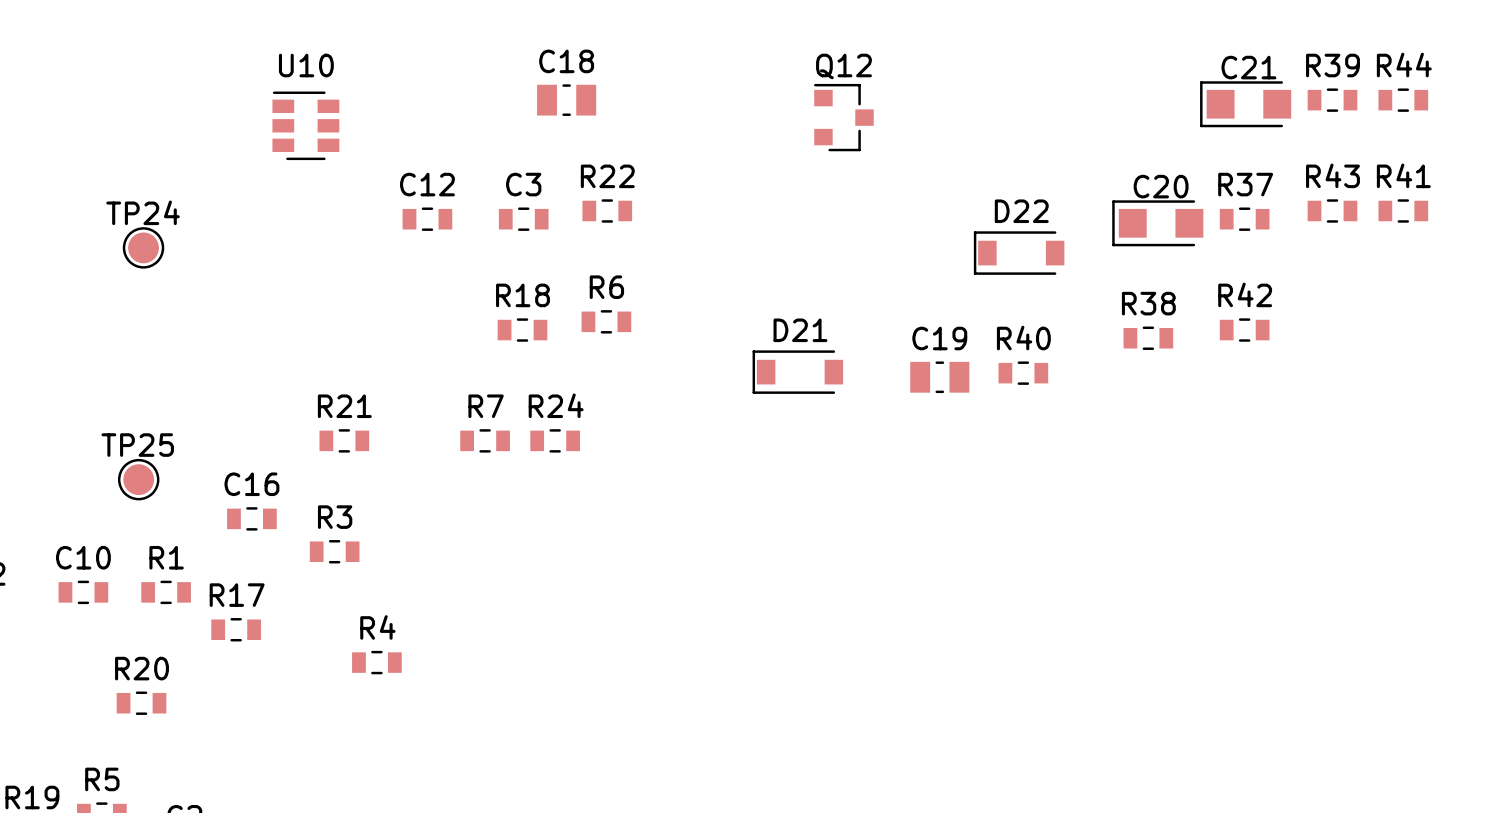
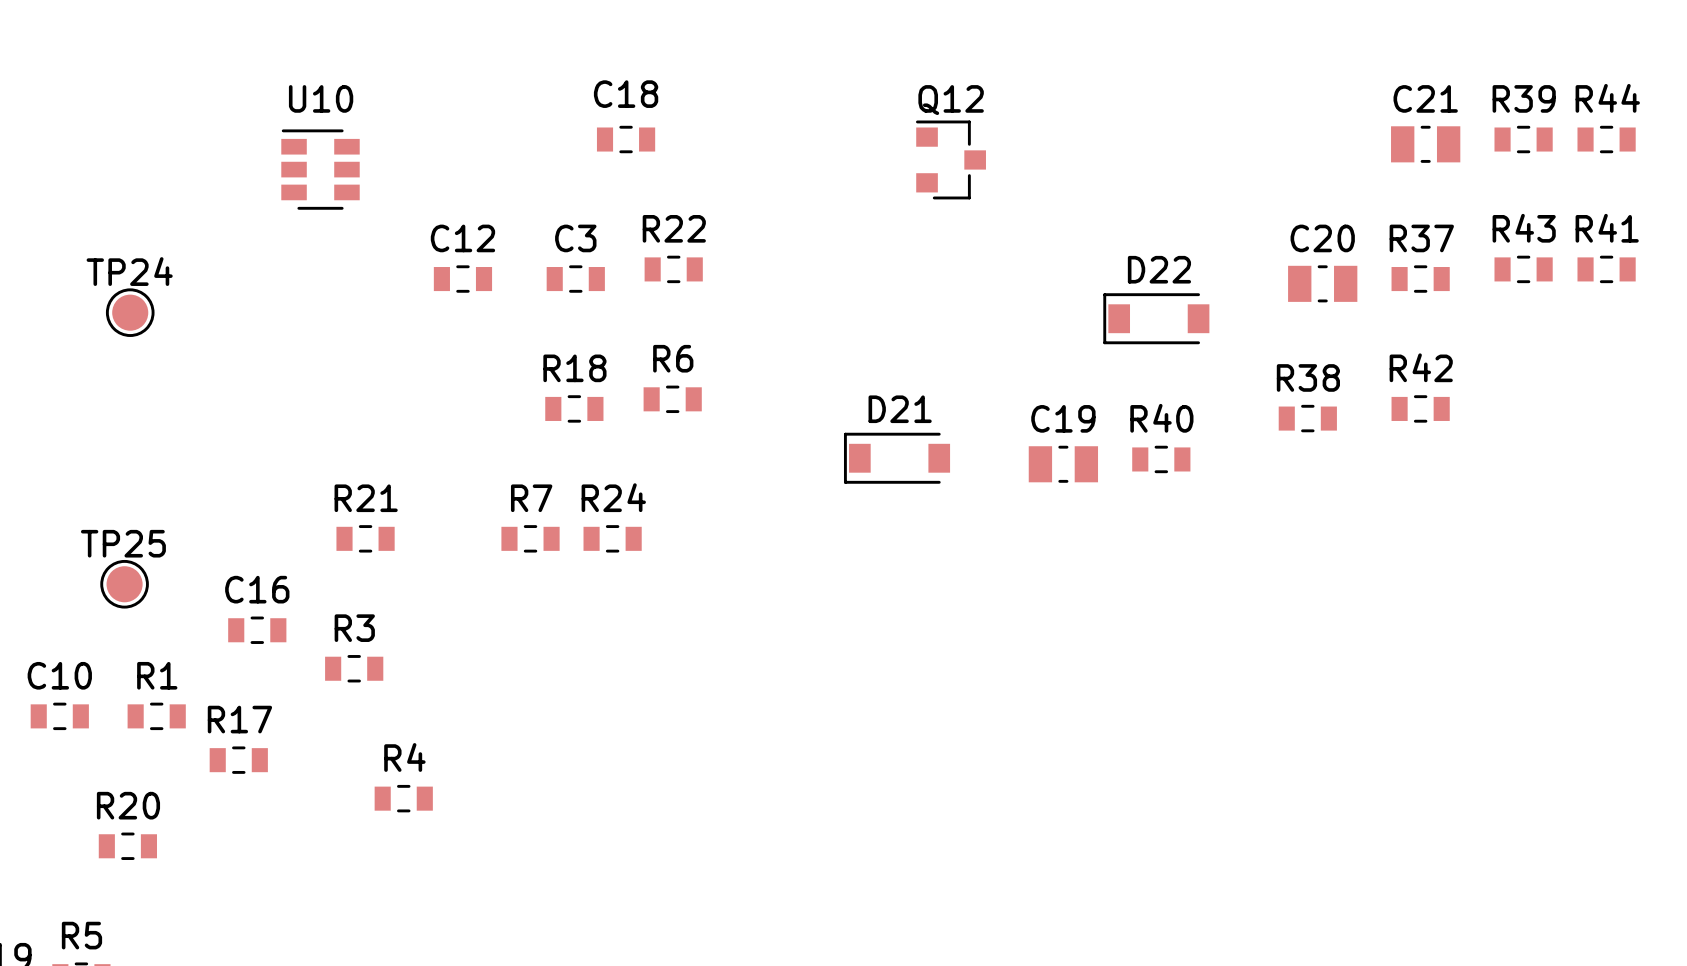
C21 footprint: [1200, 81, 1292, 128] -> [1391, 125, 1461, 163]
C18 footprint: [537, 84, 597, 116] -> [596, 125, 656, 154]
C20 footprint: [1112, 200, 1204, 247] -> [1288, 265, 1358, 303]

